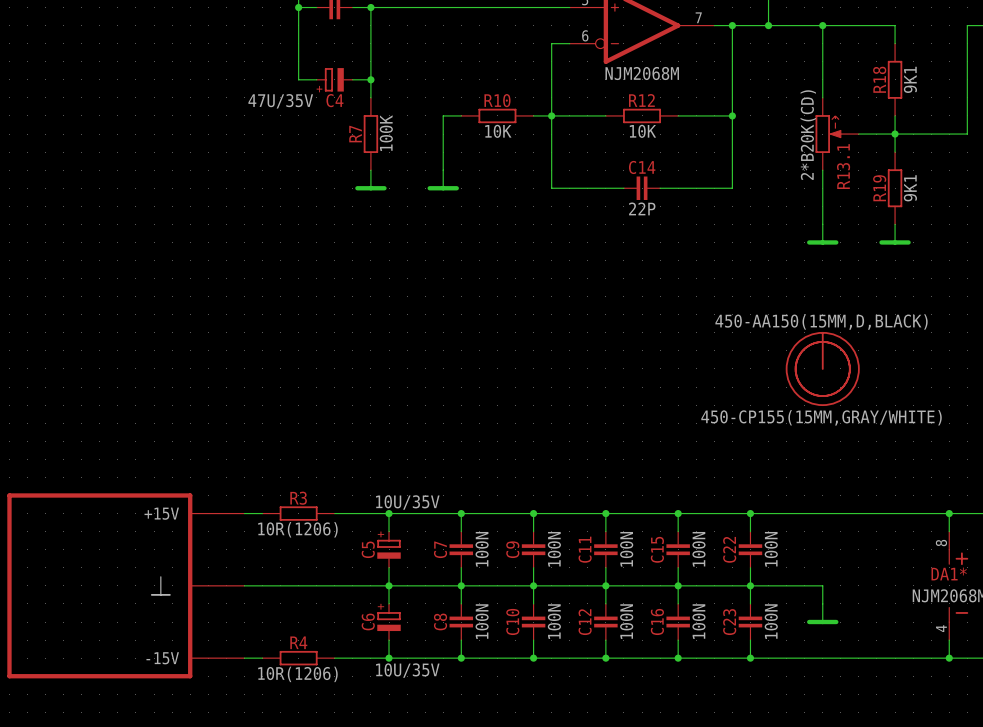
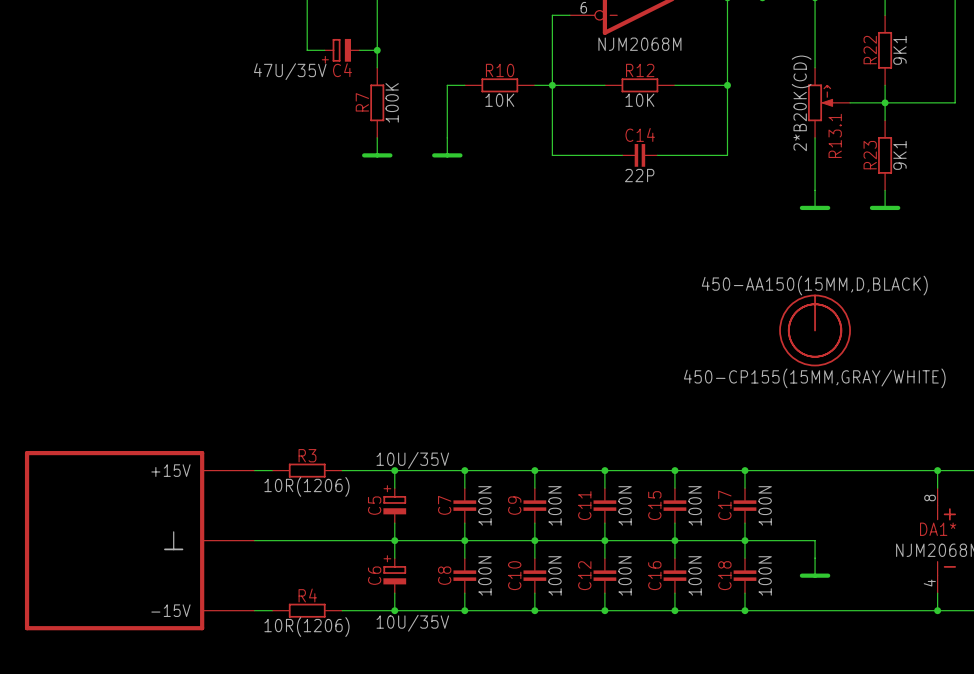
R18 name: R18 (879, 79) -> R22 (870, 50)
R19 name: R19 (879, 188) -> R23 (870, 155)
C22 name: C22 (729, 549) -> C17 (724, 505)
C23 name: C23 (729, 622) -> C18 (724, 575)

